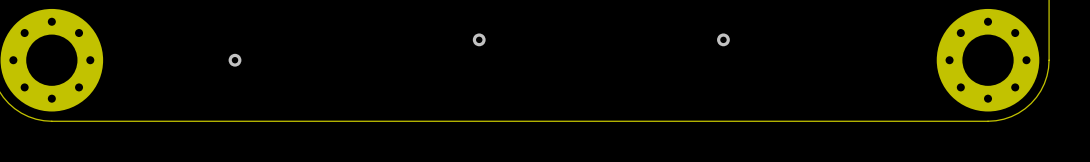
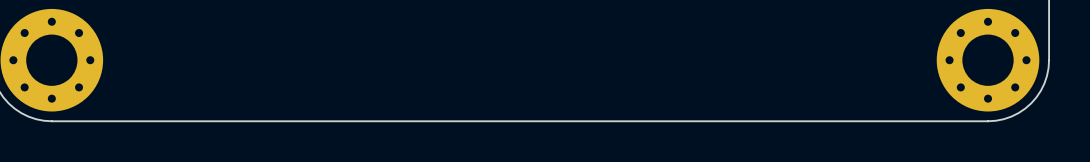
via: (479, 39) -> none
via: (723, 39) -> none
via: (235, 60) -> none

